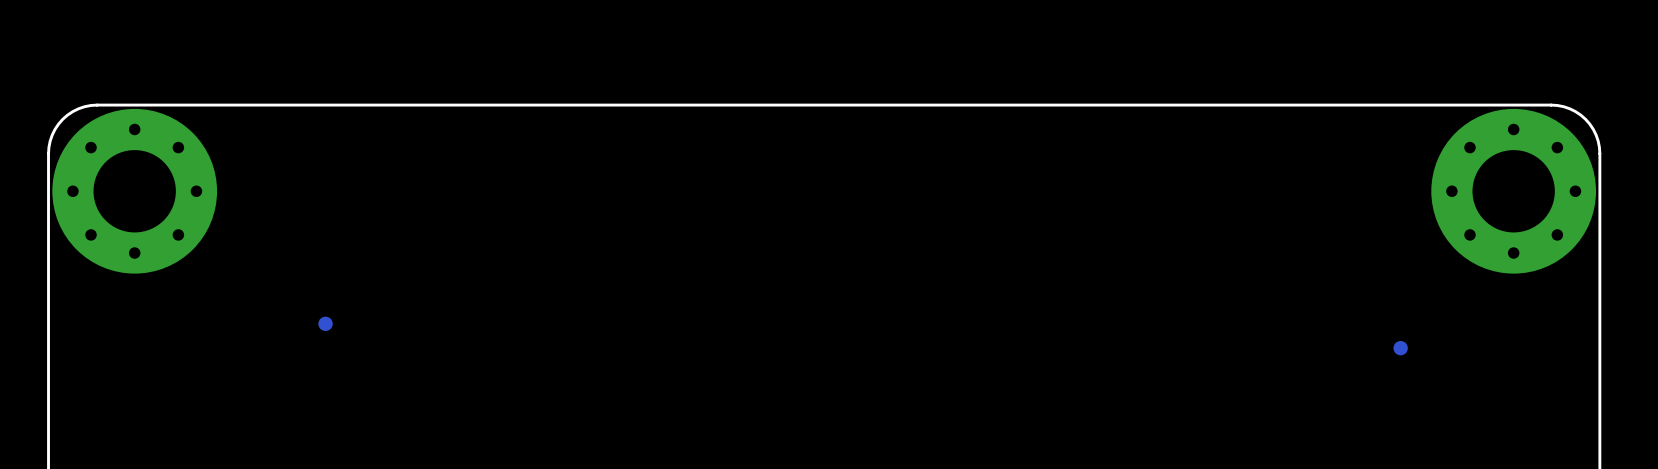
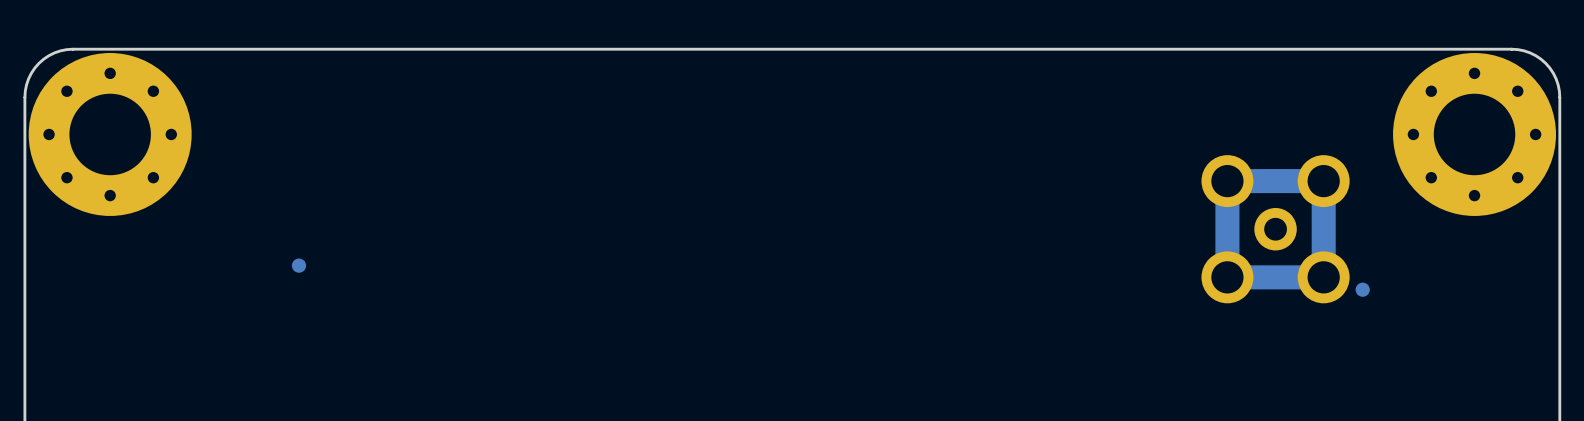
track: none -> (1323, 181) (1323, 277) (1227, 277) (1227, 181) (1323, 181)
part: none -> (1275, 229)

